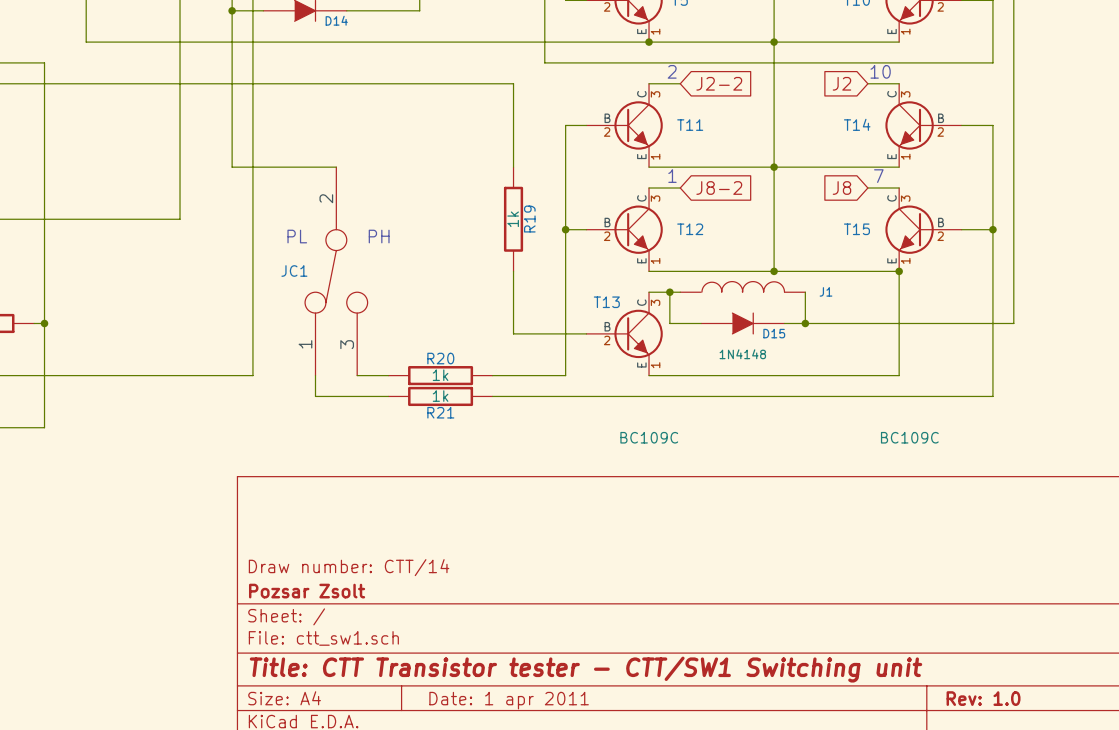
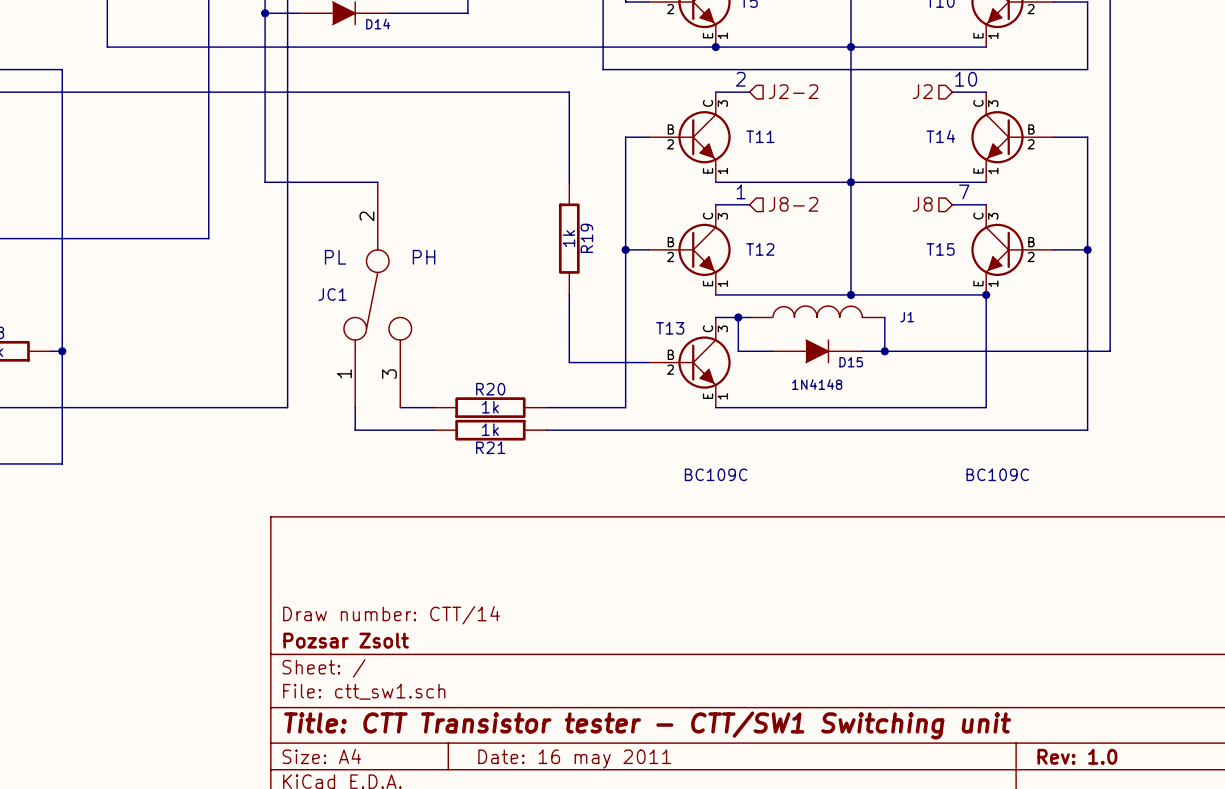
global label: J2-2 (719, 83) -> none
hierarchical label: none -> J2-2 (793, 91)
hierarchical label: none -> J2 (922, 91)
global label: J2 (841, 83) -> none
hierarchical label: none -> J8-2 (793, 204)
hierarchical label: none -> J8 (922, 204)
global label: J8-2 (719, 188) -> none
global label: J8 (841, 188) -> none
title block: Date: 1 apr 2011 (509, 700) -> Date: 16 may 2011 (574, 759)

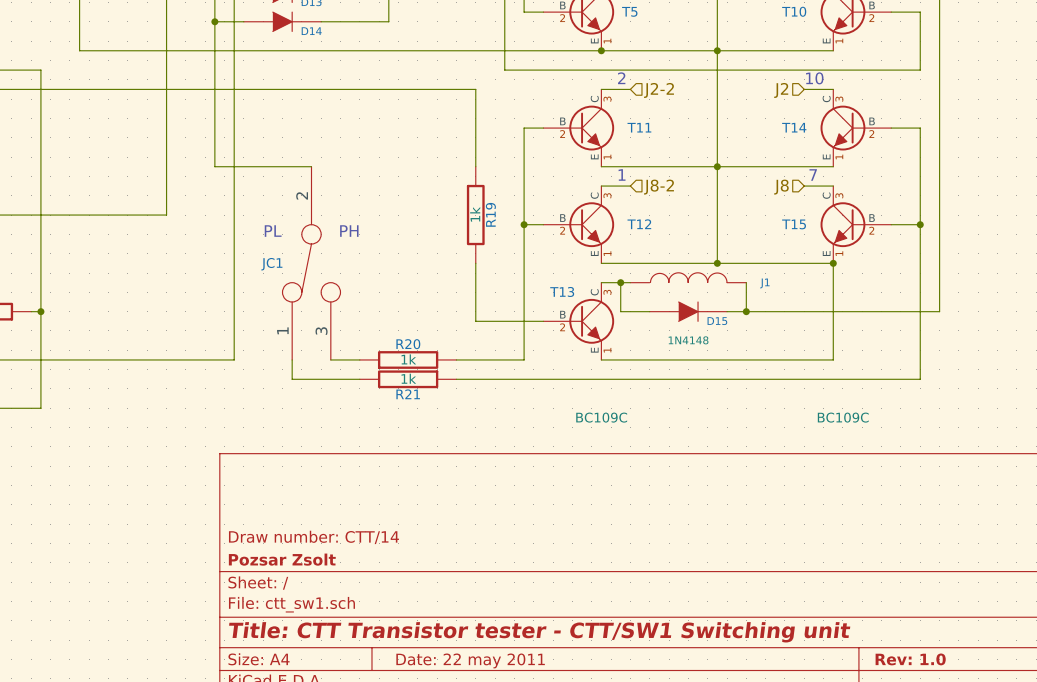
title block: Date: 16 may 2011 (574, 759) -> Date: 22 may 2011 (470, 660)

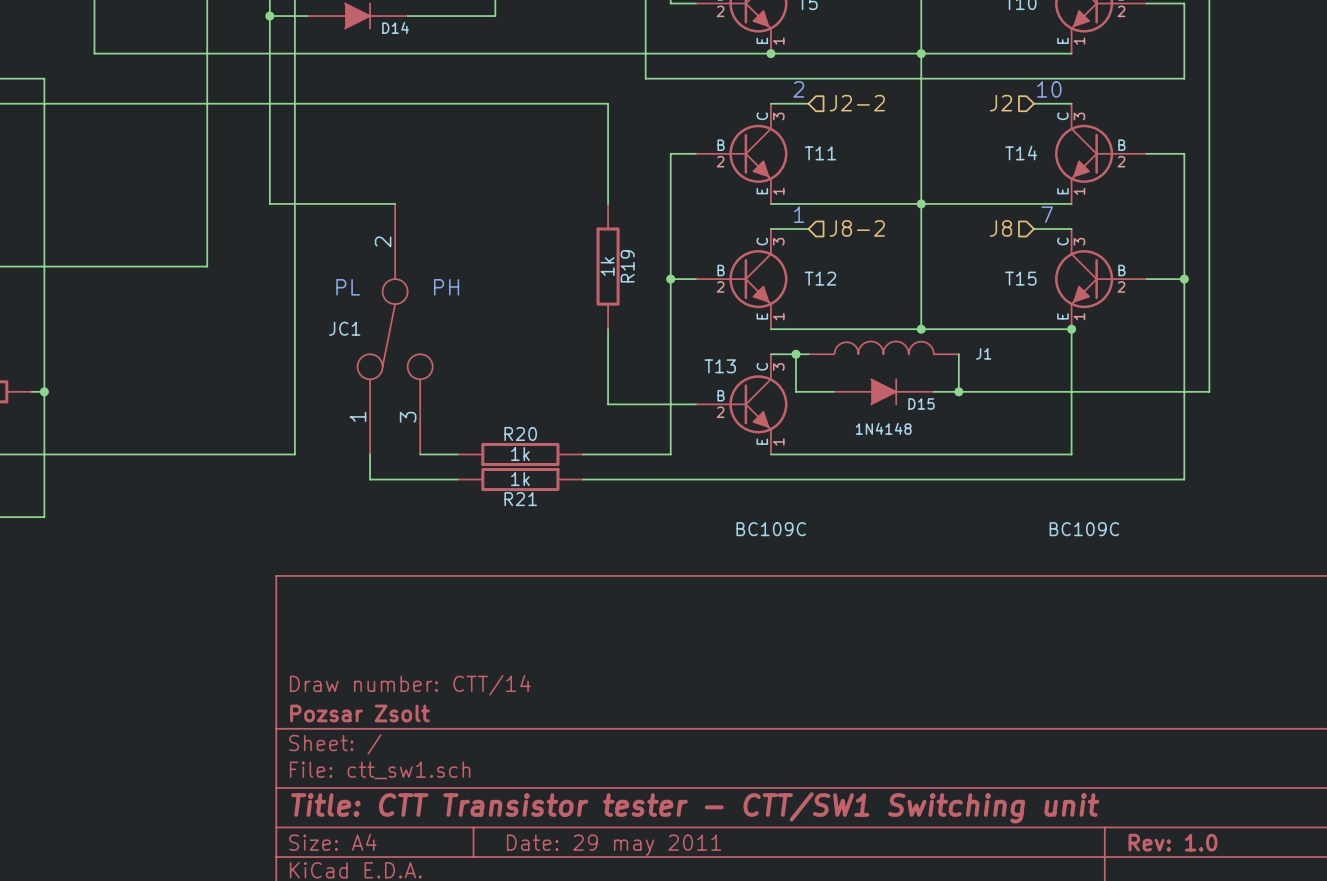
title block: Date: 22 may 2011 (470, 660) -> Date: 29 may 2011 (614, 845)

